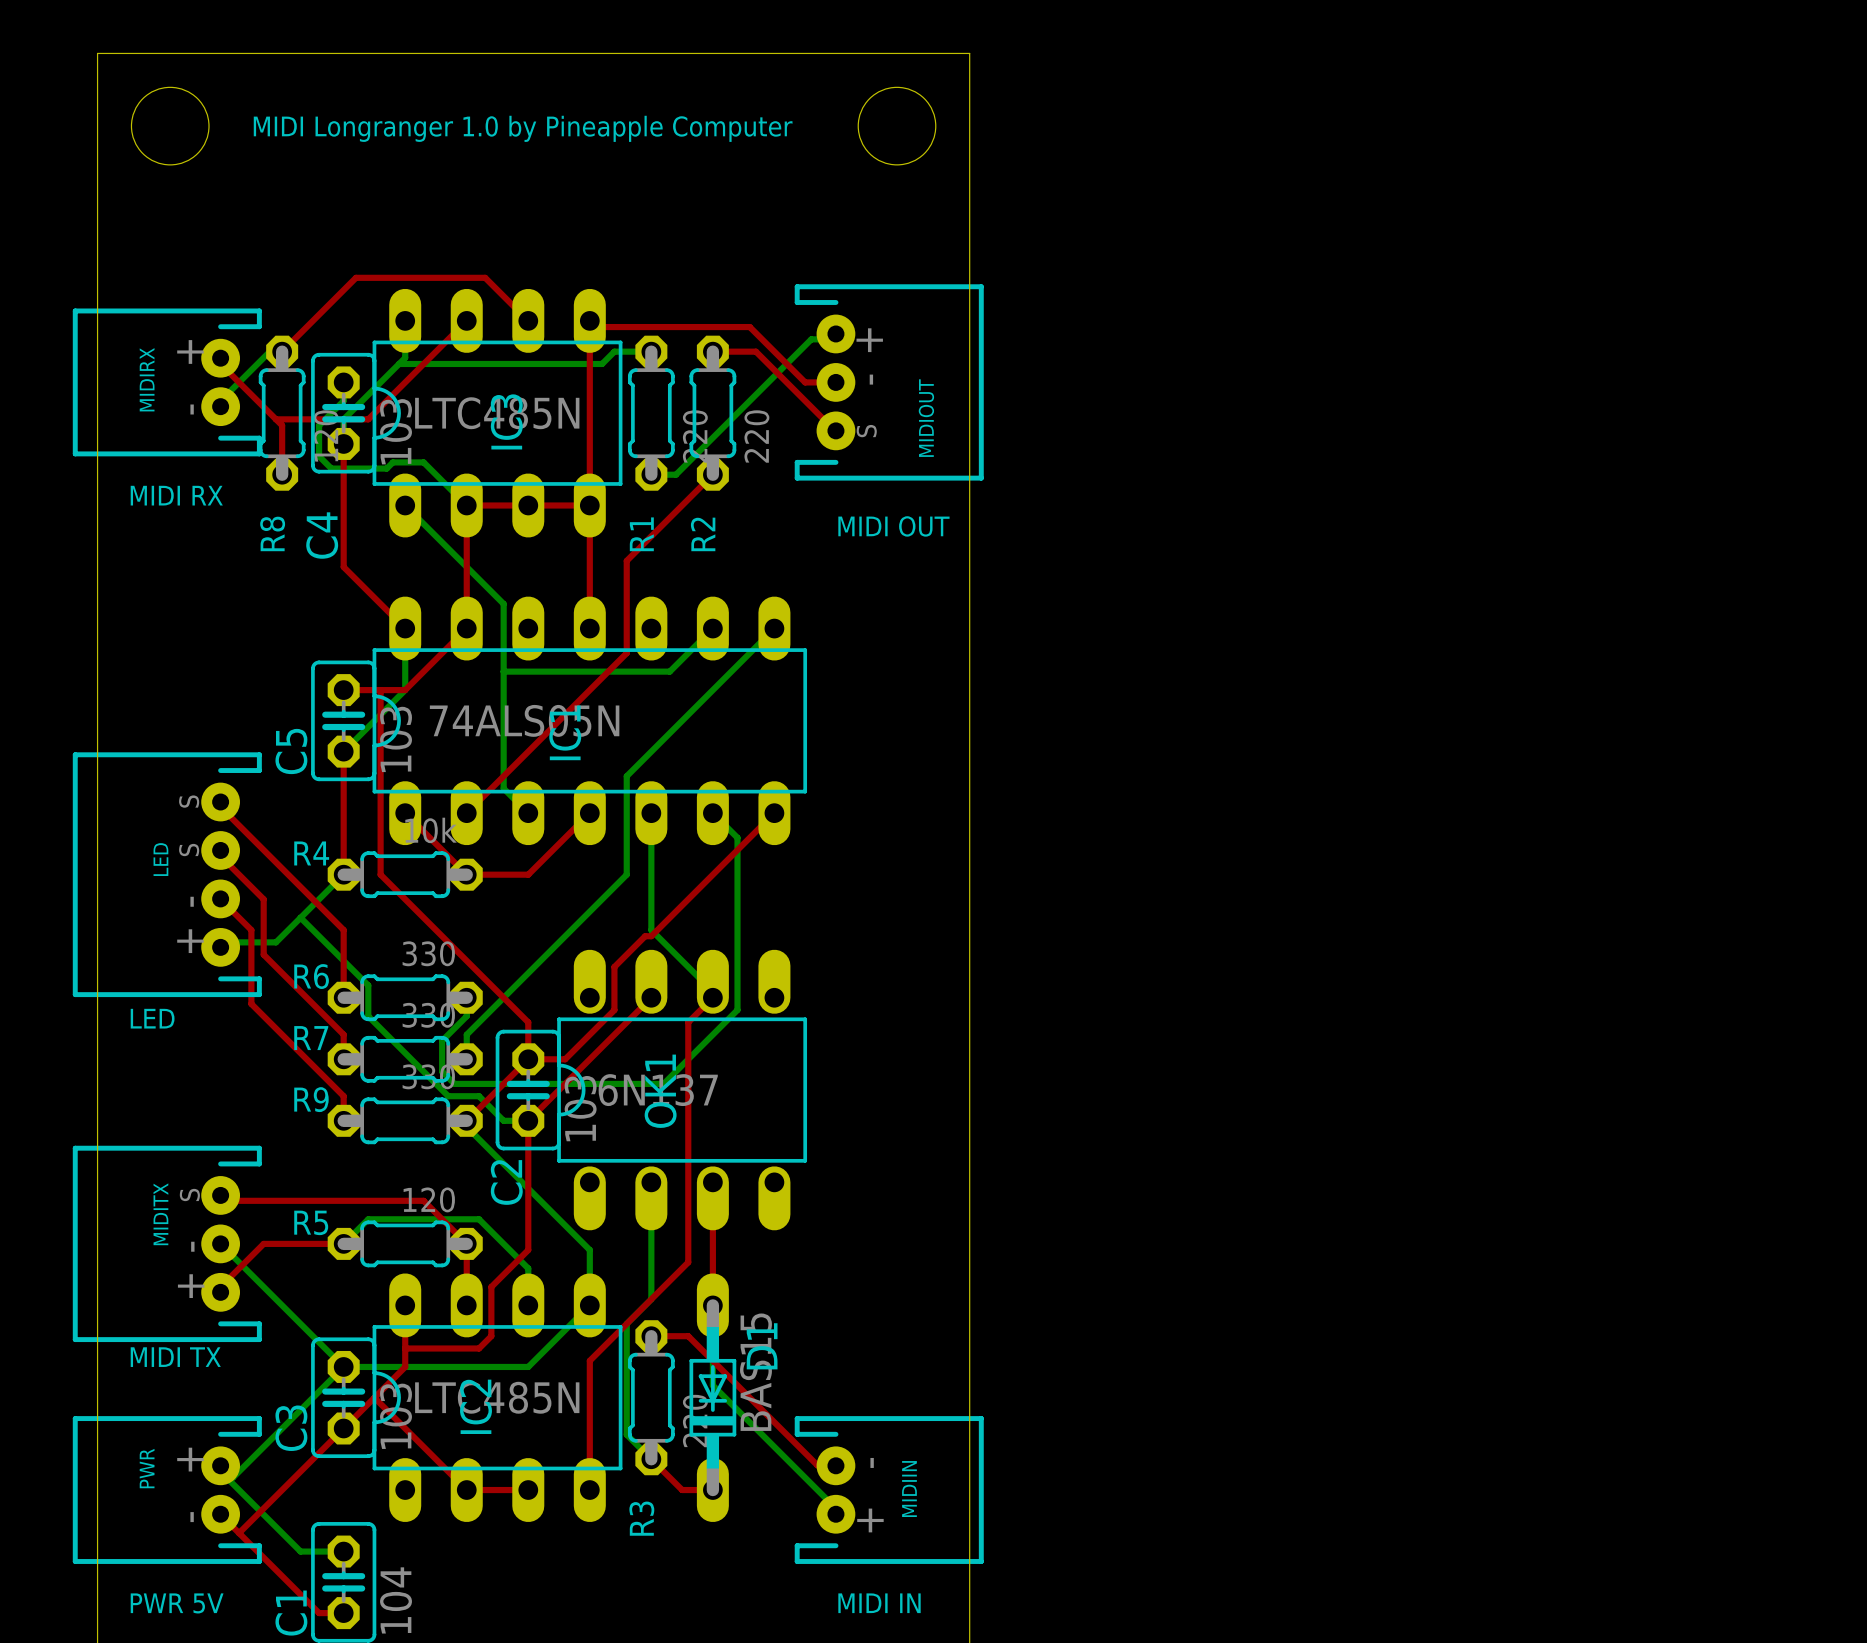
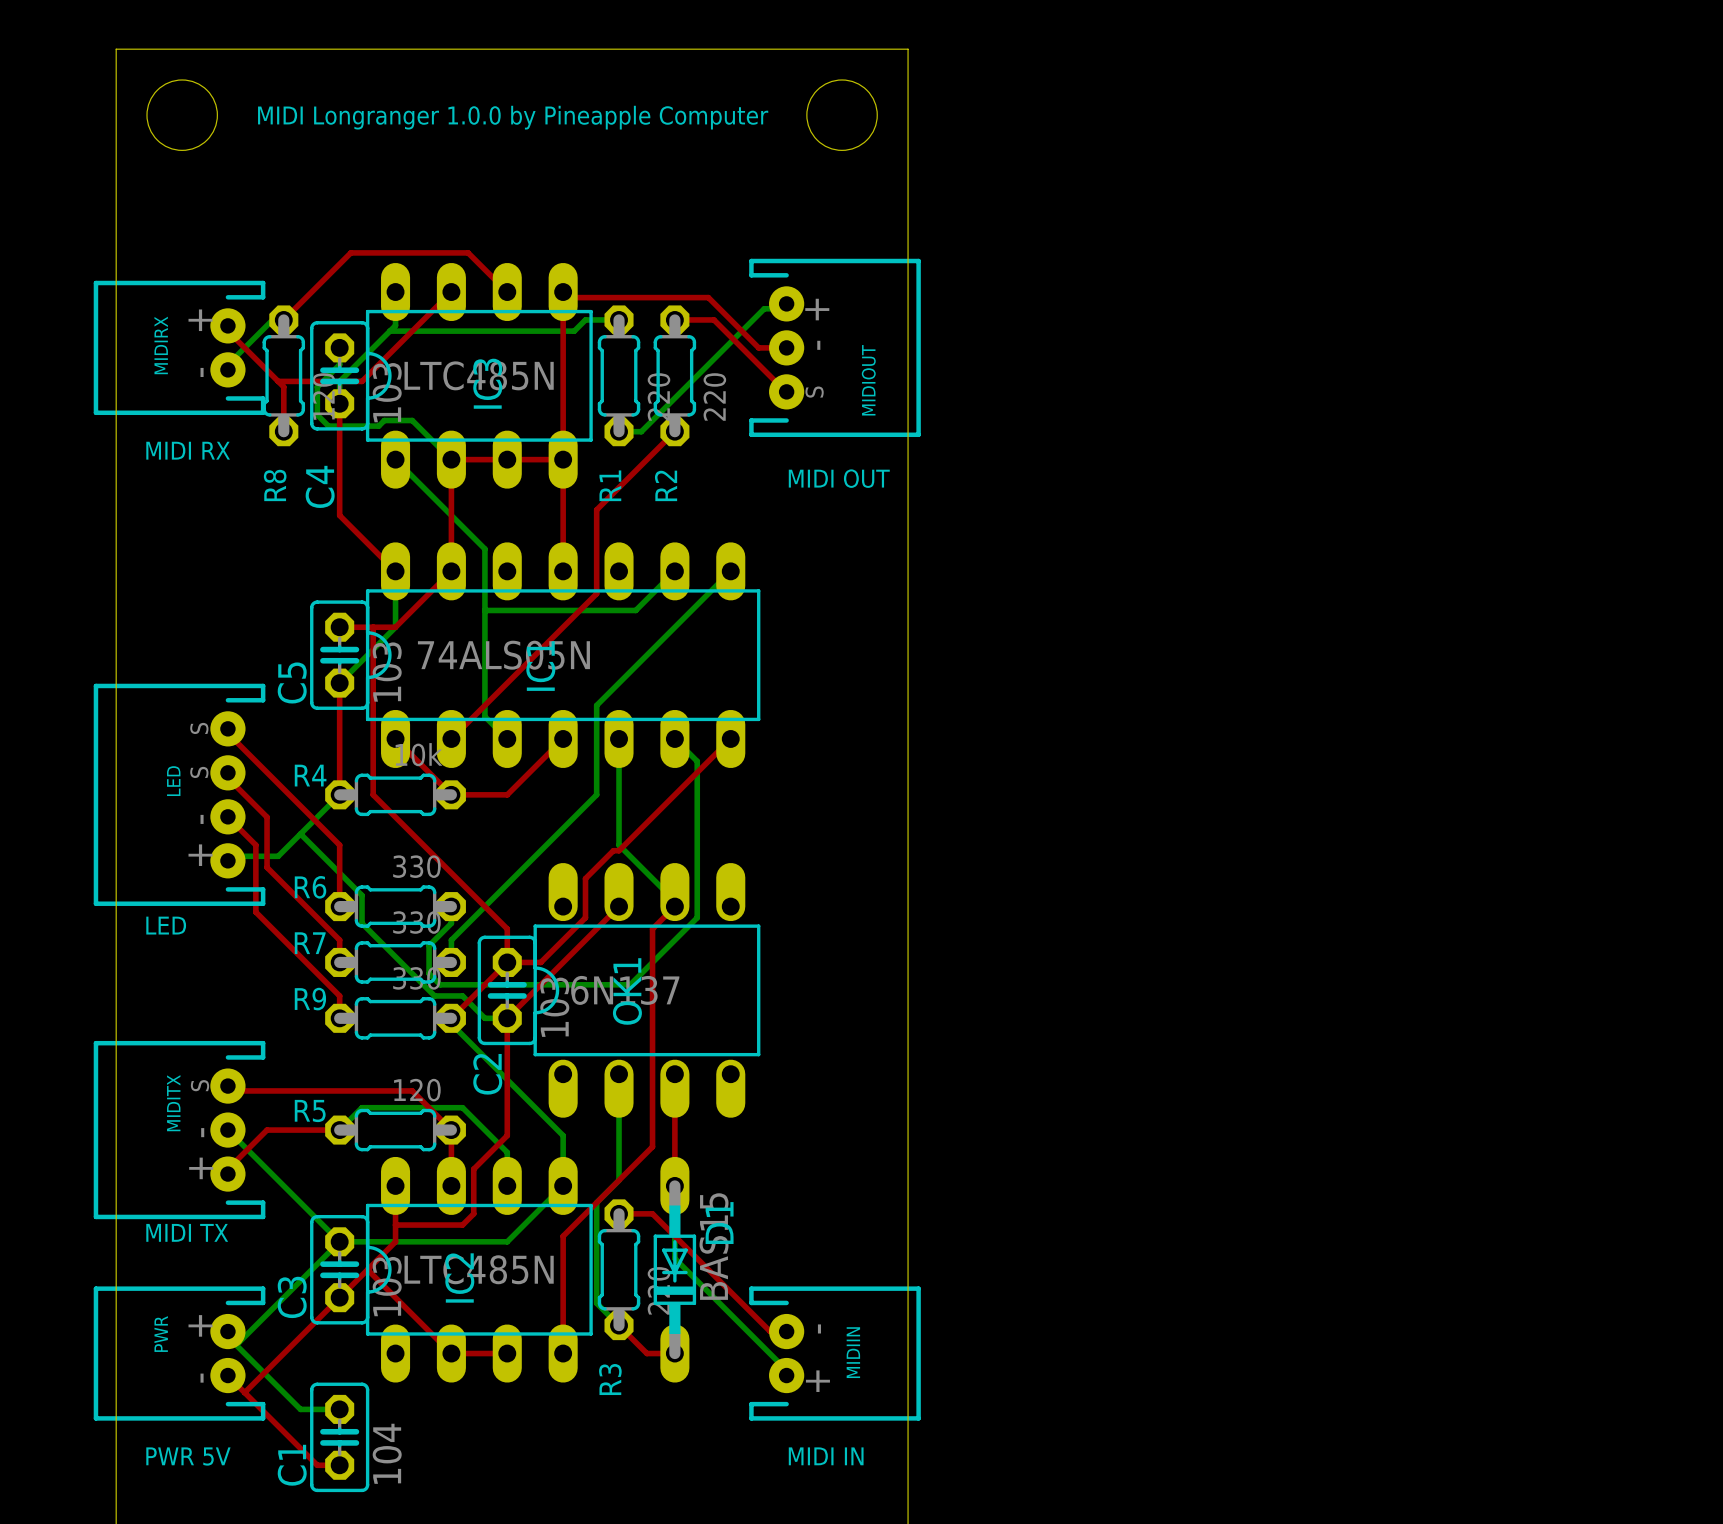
text: MIDI Longranger 1.0 by Pineapple Computer (523, 128) -> MIDI Longranger 1.0.0 by Pineapple Computer (513, 117)

